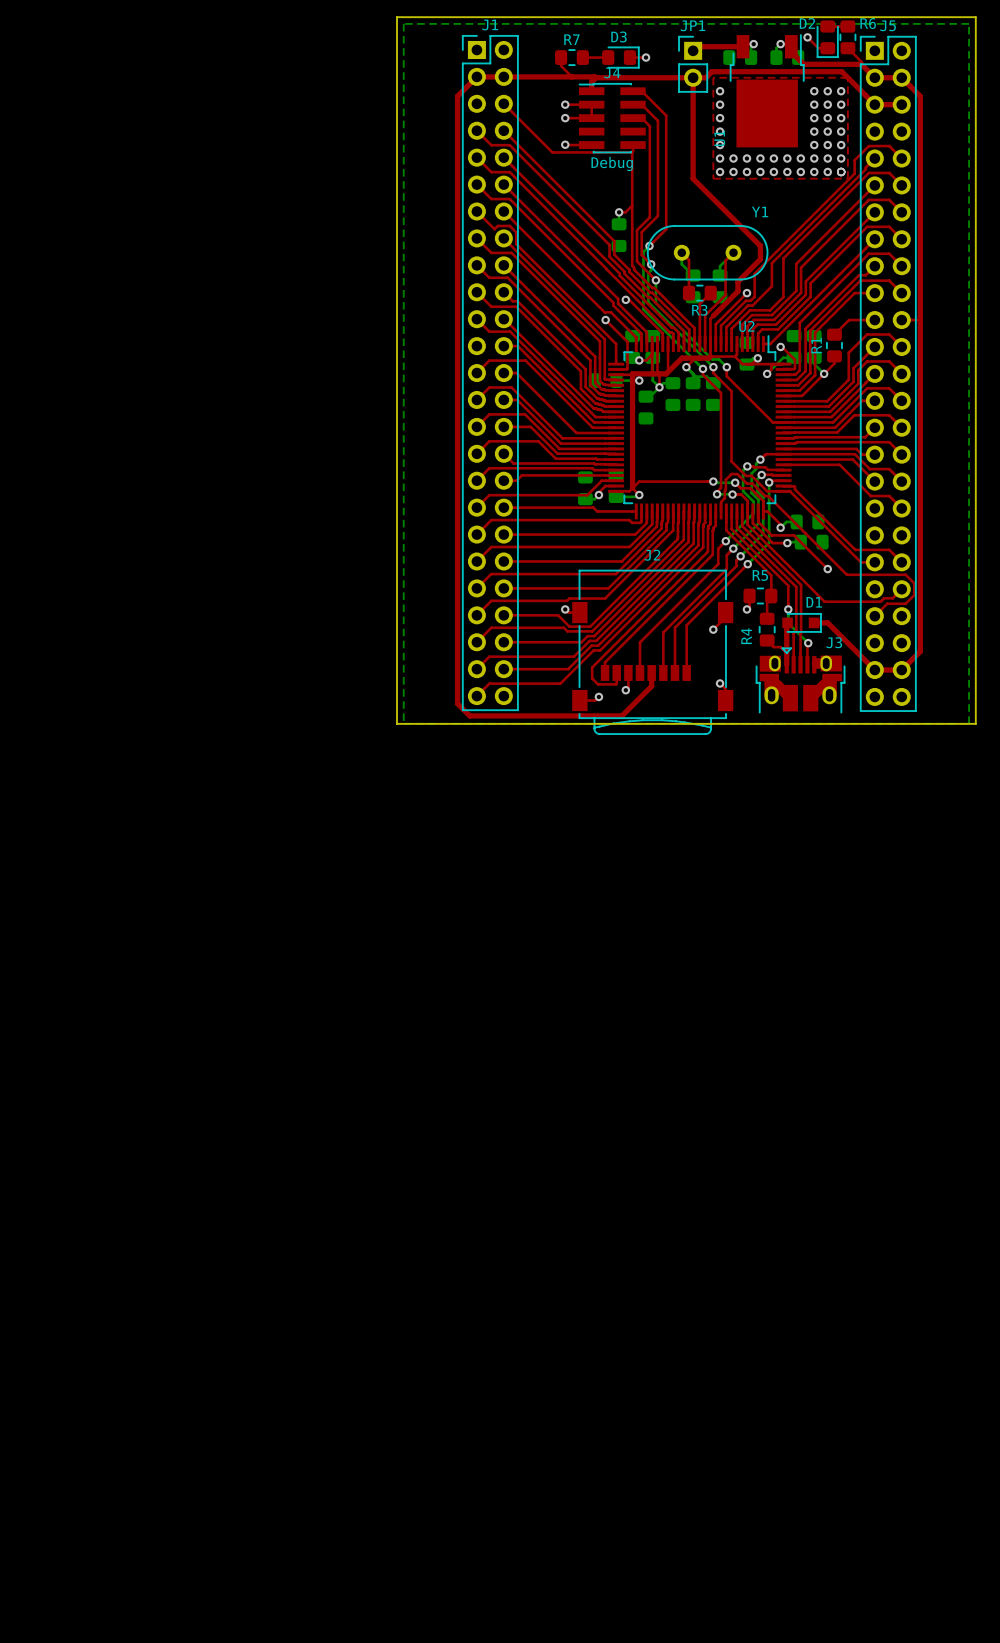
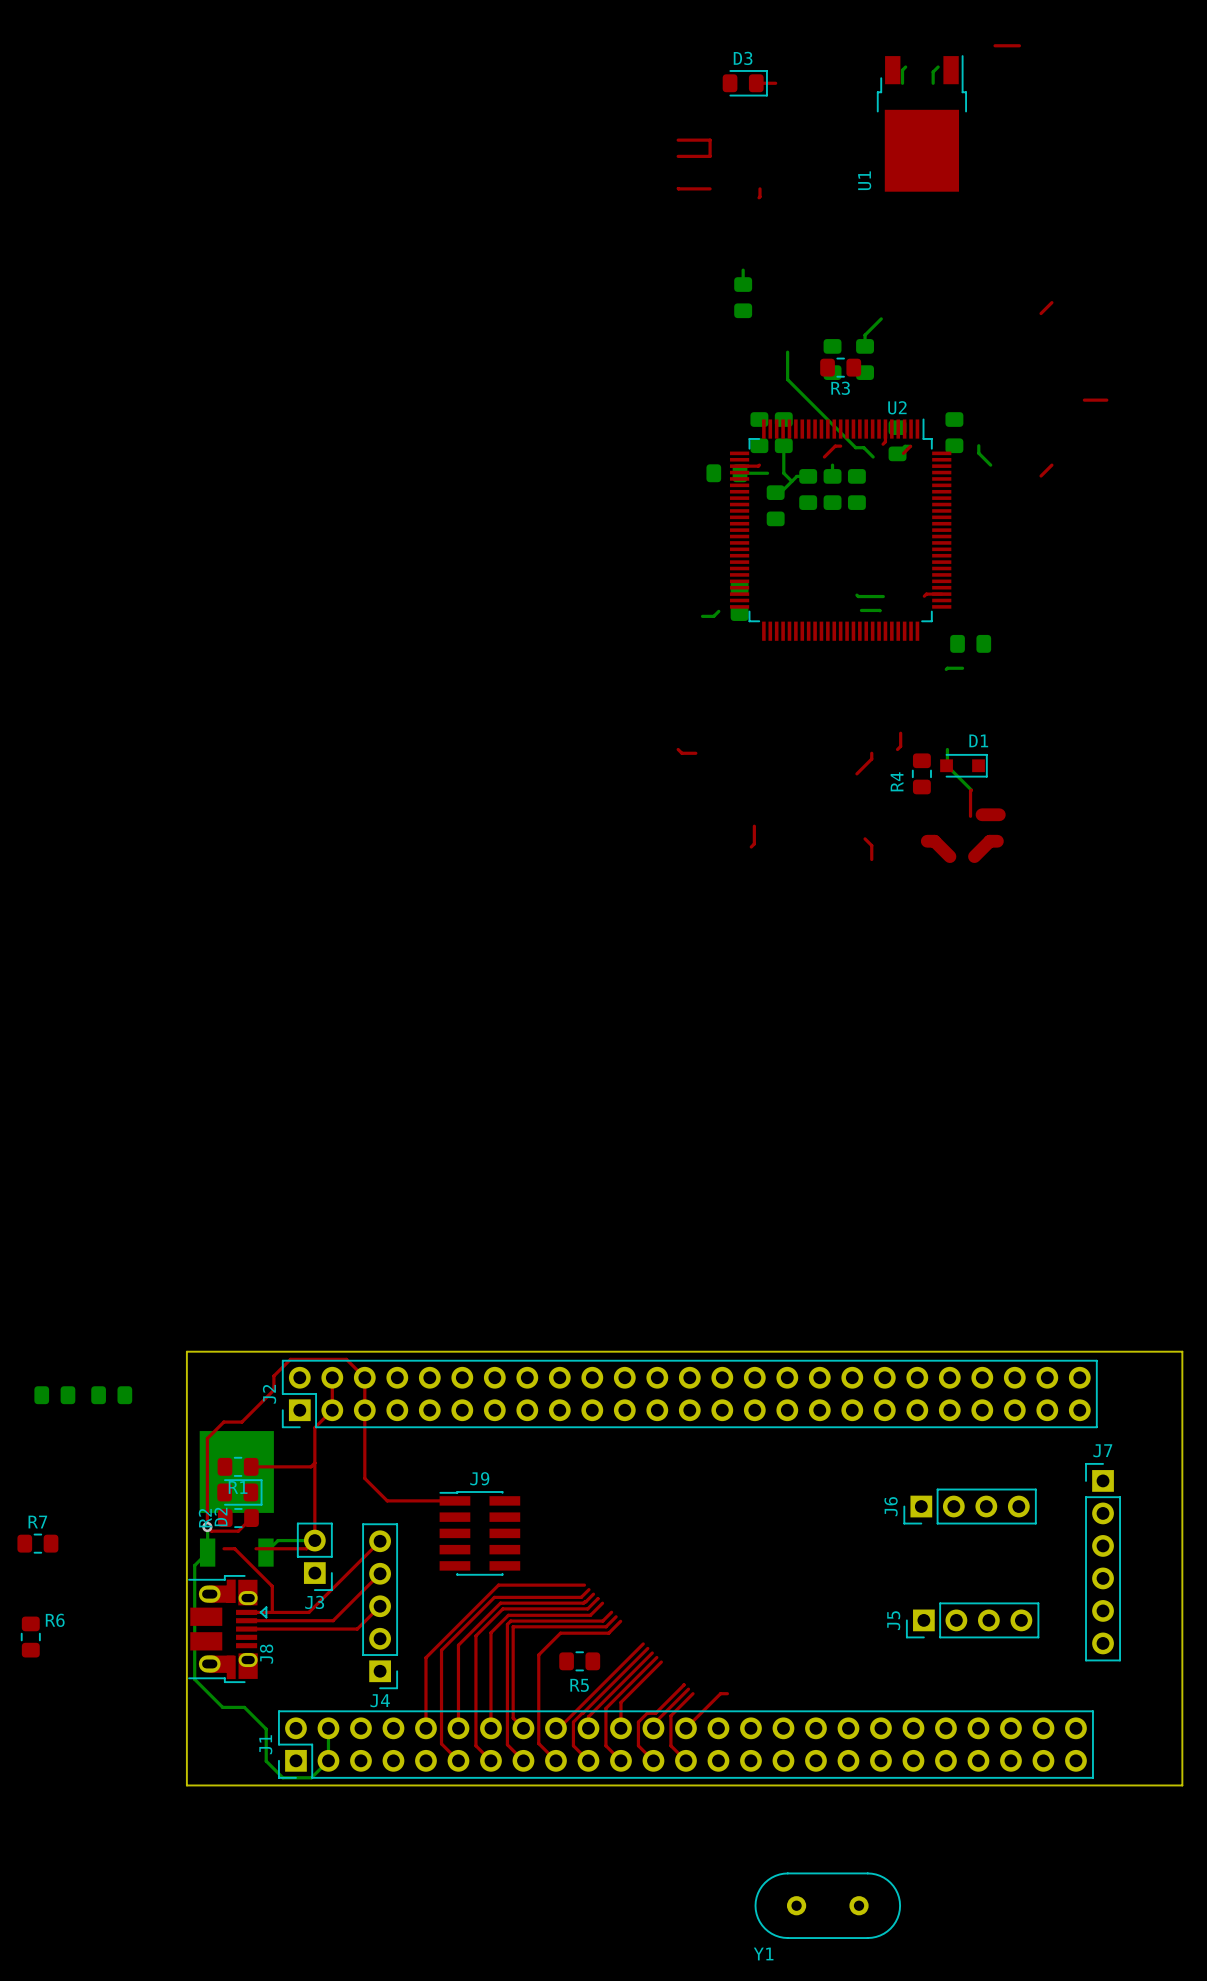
board edge: (397, 17) (397, 723) (975, 723) (975, 17) (397, 17) -> none
bottom zone outline: (403, 23) (403, 723) (969, 723) (969, 23) (403, 23) -> none
J5 name position: J5 (888, 25) -> J5 (893, 1620)
J5 footprint: [860, 36, 917, 712] -> [906, 1602, 1040, 1639]
top track: (807, 37) (818, 48) (827, 48) -> none
via: (807, 37) -> none
R6 position: (847, 37) -> (30, 1637)
D2 rotation: 0° (827, 39) -> 90° counterclockwise (239, 1492)
D2 position: (827, 39) -> (239, 1492)
top track: (753, 44) (745, 44) (743, 46) (697, 46) (693, 50) -> none
via: (753, 44) -> none
top track: (780, 44) (788, 44) (791, 46) (791, 52) (803, 64) (861, 64) -> none
via: (780, 44) -> none
top track: (847, 48) (861, 61) (861, 64) -> none
top track: (561, 57) (561, 66) (571, 76) -> none
R7 position: (571, 57) -> (37, 1543)
top track: (582, 57) (608, 57) -> none
via: (646, 57) -> none
part: (740, 57) -> none
part: (787, 57) -> none
JP1: (693, 64) -> none
top track: (861, 64) (874, 77) (901, 77) (920, 96) (920, 651) (901, 670) (874, 670) (827, 622) (814, 622) -> none
J4 name position: J4 (612, 72) -> J4 (380, 1700)
top track: (595, 77) (705, 77) (711, 71) (841, 71) (874, 104) (901, 104) -> none
top track: (595, 77) (591, 81) (591, 91) -> none
top track: (595, 77) (476, 76) (457, 96) (457, 703) (469, 715) (622, 715) (651, 686) (652, 674) -> none
top track: (693, 77) (693, 178) (760, 246) (760, 259) (737, 281) (737, 291) (710, 318) (710, 356) -> none
top zone outline: (713, 77) (713, 178) (847, 178) (847, 77) (713, 77) -> none
J4 footprint: [578, 83, 646, 154] -> [362, 1523, 398, 1690]
top track: (633, 91) (641, 91) (666, 115) (666, 229) (649, 246) -> none
via: (720, 91) -> none
via: (814, 91) -> none
via: (827, 91) -> none
via: (841, 91) -> none
top track: (503, 103) (552, 152) (632, 152) (632, 265) (694, 328) (694, 344) -> none
via: (565, 104) -> none
top track: (633, 104) (641, 104) (657, 120) (657, 215) (641, 232) (641, 254) (651, 264) -> none
via: (720, 104) -> none
via: (814, 104) -> none
via: (827, 104) -> none
via: (841, 104) -> none
via: (565, 118) -> none
top track: (633, 118) (641, 118) (649, 126) (649, 217) (637, 230) (637, 261) (655, 280) -> none
via: (720, 118) -> none
via: (814, 118) -> none
via: (827, 118) -> none
via: (841, 118) -> none
top track: (476, 130) (491, 145) (509, 145) (609, 244) (609, 256) (683, 331) (683, 344) -> none
top track: (503, 130) (614, 241) (614, 254) (689, 329) (689, 344) -> none
via: (720, 131) -> none
via: (814, 131) -> none
via: (827, 131) -> none
via: (841, 131) -> none
via: (565, 144) -> none
via: (720, 145) -> none
via: (814, 145) -> none
via: (827, 145) -> none
via: (841, 145) -> none
top track: (476, 157) (491, 172) (509, 172) (673, 333) (673, 344) -> none
top track: (503, 157) (678, 332) (678, 344) -> none
via: (720, 158) -> none
via: (733, 158) -> none
via: (746, 158) -> none
via: (760, 158) -> none
via: (773, 158) -> none
via: (787, 158) -> none
via: (800, 158) -> none
via: (814, 158) -> none
via: (827, 158) -> none
via: (841, 158) -> none
top track: (874, 158) (771, 263) (771, 286) (752, 305) (748, 305) (726, 327) (726, 344) -> none
top track: (901, 158) (889, 146) (868, 146) (854, 160) (854, 173) (754, 273) (754, 296) (750, 300) (746, 300) (721, 325) (721, 344) -> none
J4 value: Debug (612, 163) -> none
via: (720, 171) -> none
via: (733, 171) -> none
via: (746, 171) -> none
via: (760, 171) -> none
via: (773, 171) -> none
via: (787, 171) -> none
via: (800, 171) -> none
via: (814, 171) -> none
via: (827, 171) -> none
via: (841, 171) -> none
top track: (476, 184) (491, 199) (509, 199) (613, 302) (613, 305) (641, 333) (641, 344) -> none
top track: (503, 184) (618, 298) (618, 303) (646, 332) (646, 344) -> none
top track: (874, 185) (796, 263) (796, 290) (772, 315) (751, 315) (742, 324) (742, 344) -> none
top track: (901, 185) (889, 172) (868, 172) (783, 258) (783, 297) (770, 310) (749, 310) (731, 328) (731, 344) -> none
top track: (632, 205) (625, 212) (619, 212) -> none
top track: (476, 211) (494, 229) (497, 225) (509, 225) (516, 232) (516, 244) (616, 343) (616, 364) -> none
top track: (503, 211) (604, 312) (611, 312) (636, 337) (636, 344) -> none
Y1 name position: Y1 (760, 211) -> Y1 (763, 1954)
via: (619, 212) -> none
top track: (874, 212) (805, 281) (805, 294) (776, 324) (757, 324) (752, 329) (752, 344) -> none
top track: (901, 212) (889, 199) (868, 199) (801, 267) (801, 292) (774, 319) (753, 319) (747, 326) (747, 344) -> none
top track: (476, 238) (491, 252) (511, 252) (599, 341) (599, 380) (603, 384) (616, 385) -> none
top track: (503, 238) (604, 339) (604, 378) (616, 380) -> none
top track: (901, 239) (889, 226) (867, 226) (810, 283) (810, 296) (778, 329) (762, 329) (758, 333) (758, 344) -> none
bottom track: (649, 246) (643, 252) (643, 309) (701, 369) -> none
via: (649, 246) -> none
top track: (865, 248) (770, 344) (763, 344) -> none
top track: (681, 252) (689, 259) (689, 293) -> none
bottom track: (681, 252) (681, 264) (693, 275) -> none
Y1 position: (707, 252) -> (827, 1905)
top track: (733, 252) (725, 260) (725, 295) (705, 315) (705, 344) -> none
bottom track: (651, 264) (651, 270) (648, 273) (648, 302) (713, 367) -> none
via: (651, 264) -> none
top track: (476, 265) (489, 277) (507, 277) (590, 360) (590, 384) (599, 393) (616, 395) -> none
top track: (503, 265) (595, 356) (595, 382) (601, 389) (616, 390) -> none
top track: (874, 266) (865, 275) (859, 275) (805, 328) (805, 371) (796, 380) (783, 380) -> none
top track: (901, 266) (889, 253) (868, 253) (799, 322) (799, 370) (795, 374) (783, 374) -> none
via: (655, 280) -> none
top track: (476, 292) (491, 306) (516, 306) (580, 371) (580, 388) (595, 403) (604, 406) (616, 406) -> none
top track: (503, 292) (512, 301) (517, 301) (585, 369) (585, 386) (597, 398) (616, 401) -> none
top track: (710, 293) (699, 303) (699, 344) -> none
top track: (746, 293) (715, 324) (715, 344) -> none
via: (746, 293) -> none
top track: (874, 293) (854, 293) (815, 332) (815, 375) (799, 390) (783, 390) -> none
top track: (901, 293) (889, 280) (860, 280) (810, 330) (810, 373) (798, 385) (783, 385) -> none
top track: (625, 299) (629, 299) (662, 333) (662, 344) -> none
via: (625, 299) -> none
top track: (476, 319) (489, 331) (510, 331) (595, 417) (616, 417) -> none
top track: (503, 319) (593, 408) (603, 411) (616, 411) -> none
top track: (605, 320) (627, 341) (627, 368) (616, 369) -> none
via: (605, 320) -> none
top track: (874, 320) (849, 320) (834, 334) -> none
top track: (652, 344) (652, 373) -> none
top track: (657, 344) (659, 387) -> none
top track: (668, 344) (668, 372) (666, 373) -> none
R1 name position: R1 (816, 345) -> R1 (238, 1487)
R1 rotation: 0° (834, 345) -> 90° clockwise (238, 1466)
R1 position: (834, 345) -> (238, 1466)
top track: (503, 346) (517, 346) (594, 422) (616, 422) -> none
top track: (780, 346) (794, 359) (794, 369) (783, 369) -> none
via: (780, 346) -> none
part: (814, 346) -> none
top track: (874, 346) (853, 368) (853, 381) (828, 406) (783, 406) -> none
top track: (901, 346) (889, 334) (867, 334) (848, 352) (848, 379) (827, 401) (783, 401) -> none
top track: (652, 354) (646, 360) (639, 360) -> none
top track: (710, 356) (734, 356) (742, 364) (783, 364) -> none
top track: (710, 356) (681, 358) (666, 373) -> none
top track: (834, 356) (834, 363) (802, 395) (783, 395) -> none
bottom track: (794, 357) (783, 357) (767, 373) -> none
via: (757, 358) -> none
via: (639, 360) -> none
top track: (772, 364) (767, 373) -> none
bottom track: (686, 367) (695, 376) (706, 376) (713, 383) -> none
via: (686, 367) -> none
top track: (713, 367) (713, 373) (731, 391) (731, 461) (745, 475) (751, 475) (767, 491) (790, 491) (861, 562) (874, 562) -> none
via: (713, 367) -> none
top track: (726, 367) (726, 376) (772, 422) (833, 422) (867, 388) (889, 388) (901, 400) -> none
via: (726, 367) -> none
top track: (702, 368) (702, 374) (721, 392) (721, 487) (717, 494) -> none
via: (702, 368) -> none
top track: (476, 373) (489, 360) (525, 360) (592, 427) (616, 427) -> none
J1 rotation: 0° (490, 373) -> 90° counterclockwise (685, 1744)
J1 position: (490, 373) -> (685, 1744)
top track: (503, 373) (516, 373) (576, 433) (610, 433) -> none
top track: (666, 373) (632, 373) (632, 488) (639, 495) -> none
via: (767, 373) -> none
via: (824, 373) -> none
top track: (901, 373) (889, 361) (867, 361) (858, 370) (858, 383) (830, 411) (783, 411) -> none
via: (639, 380) -> none
top track: (865, 382) (831, 417) (783, 417) -> none
via: (659, 387) -> none
top track: (476, 399) (489, 387) (511, 387) (562, 438) (616, 438) -> none
top track: (503, 399) (517, 399) (561, 443) (616, 443) -> none
top track: (874, 400) (862, 400) (835, 427) (780, 427) -> none
top track: (476, 426) (489, 414) (525, 414) (559, 448) (616, 448) -> none
top track: (503, 426) (530, 426) (557, 453) (616, 454) -> none
top track: (874, 427) (865, 437) (783, 438) -> none
top track: (901, 427) (889, 415) (854, 415) (837, 432) (783, 433) -> none
top track: (783, 443) (889, 442) (901, 454) -> none
top track: (783, 448) (856, 448) (862, 454) (874, 454) -> none
top track: (476, 453) (489, 441) (538, 441) (555, 458) (616, 459) -> none
top track: (503, 453) (513, 463) (616, 464) -> none
top track: (760, 459) (765, 454) (854, 454) (869, 469) (889, 469) (901, 481) -> none
bottom track: (760, 459) (751, 473) (751, 493) (758, 499) (758, 523) (733, 548) -> none
via: (760, 459) -> none
top track: (783, 459) (852, 459) (874, 481) -> none
top track: (783, 464) (839, 464) (870, 496) (889, 496) (901, 508) -> none
top track: (747, 466) (783, 470) -> none
bottom track: (747, 466) (743, 470) (743, 491) (753, 501) (753, 513) (725, 541) -> none
via: (747, 466) -> none
top track: (616, 470) (594, 470) (592, 468) (489, 468) (476, 480) -> none
top track: (761, 474) (783, 475) -> none
bottom track: (761, 474) (757, 479) (757, 492) (763, 497) (763, 533) (740, 556) -> none
via: (761, 474) -> none
top track: (616, 475) (521, 475) (516, 480) (503, 480) -> none
top track: (616, 480) (601, 480) (587, 495) (489, 495) (476, 507) -> none
top track: (713, 481) (639, 481) (629, 491) (616, 491) -> none
via: (713, 481) -> none
top track: (735, 482) (740, 488) (750, 488) (763, 501) (763, 511) (767, 511) (780, 524) (780, 527) -> none
via: (735, 482) -> none
bottom track: (769, 482) (769, 542) (747, 564) -> none
via: (769, 482) -> none
top track: (616, 486) (605, 486) (598, 495) -> none
top track: (783, 486) (794, 486) (794, 489) (855, 549) (889, 549) (901, 562) -> none
part: (585, 488) -> none
via: (717, 494) -> none
top track: (732, 494) (741, 494) (747, 500) (747, 524) (824, 601) (880, 601) (884, 598) (892, 598) (901, 589) -> none
via: (732, 494) -> none
via: (598, 495) -> none
bottom track: (639, 495) (637, 496) (616, 496) -> none
via: (639, 495) -> none
top track: (503, 507) (593, 507) (597, 511) (636, 511) -> none
top track: (641, 511) (640, 522) (632, 522) (629, 520) (491, 520) (476, 534) -> none
top track: (646, 511) (646, 523) (635, 534) (503, 534) -> none
top track: (652, 511) (652, 524) (629, 547) (491, 547) (476, 561) -> none
top track: (657, 511) (656, 526) (621, 561) (503, 561) -> none
top track: (662, 511) (661, 528) (616, 574) (491, 574) (476, 588) -> none
top track: (668, 511) (666, 530) (608, 588) (503, 588) -> none
top track: (673, 511) (673, 530) (605, 598) (569, 598) (567, 600) (491, 600) (476, 615) -> none
top track: (678, 511) (677, 538) -> none
top track: (683, 511) (683, 539) (592, 631) (567, 631) (563, 627) (491, 627) (476, 642) -> none
top track: (689, 511) (688, 541) (594, 636) (587, 636) (581, 642) (503, 642) -> none
top track: (694, 511) (693, 543) (596, 640) (589, 640) (573, 656) (489, 656) (476, 669) -> none
top track: (699, 511) (698, 545) (598, 645) (591, 645) (568, 669) (503, 669) -> none
top track: (705, 511) (703, 547) (600, 650) (593, 650) (560, 683) (489, 683) (476, 696) -> none
top track: (710, 511) (707, 551) (592, 667) (592, 678) (598, 684) (615, 684) (616, 672) -> none
top track: (715, 511) (715, 525) (712, 530) (712, 554) (605, 662) (605, 672) -> none
top track: (721, 511) (721, 502) (724, 498) (725, 479) (731, 474) (737, 474) (746, 483) (752, 483) (765, 496) (768, 496) (846, 574) (905, 574) (914, 583) (914, 595) (905, 603) (887, 603) (874, 616) -> none
top track: (726, 511) (726, 530) (771, 575) (771, 595) (767, 600) (767, 618) -> none
top track: (731, 511) (731, 529) (788, 585) (788, 609) -> none
top track: (736, 511) (736, 527) (796, 586) (793, 664) -> none
top track: (742, 511) (742, 526) (801, 584) (800, 664) -> none
top track: (752, 511) (752, 523) (772, 543) (787, 543) -> none
top track: (758, 511) (758, 522) (771, 535) (794, 535) (827, 569) -> none
bottom track: (796, 521) (786, 521) (780, 527) -> none
via: (780, 527) -> none
top track: (677, 538) (590, 626) (569, 626) (558, 615) (503, 615) -> none
top track: (725, 541) (718, 548) (718, 564) (640, 642) (640, 672) -> none
via: (725, 541) -> none
part: (811, 542) -> none
via: (787, 543) -> none
top track: (733, 548) (726, 555) (726, 569) (663, 632) (663, 672) -> none
via: (733, 548) -> none
J2 name position: J2 (652, 555) -> J2 (269, 1394)
top track: (740, 556) (736, 560) (736, 566) (675, 627) (675, 672) -> none
via: (740, 556) -> none
top track: (747, 564) (686, 625) (686, 672) -> none
via: (747, 564) -> none
J2 footprint: [572, 569, 734, 735] -> [282, 1359, 1098, 1429]
via: (827, 569) -> none
R5 name position: R5 (760, 575) -> R5 (579, 1685)
R5 position: (760, 595) -> (579, 1661)
via: (565, 609) -> none
via: (746, 609) -> none
via: (788, 609) -> none
top track: (787, 622) (786, 664) (786, 653) (780, 647) (773, 647) (767, 640) -> none
via: (713, 629) -> none
J3 name position: J3 (834, 642) -> J3 (314, 1602)
via: (808, 643) -> none
J3 footprint: [755, 647, 846, 714] -> [297, 1522, 333, 1591]
via: (720, 683) -> none
via: (625, 690) -> none
top track: (598, 696) (595, 700) (579, 700) -> none
via: (598, 696) -> none
board edge: none -> (186, 1351) (186, 1785) (1182, 1785) (1182, 1351) (186, 1351)
top track: none -> (332, 1377) (332, 1410) (314, 1427) (314, 1540) (306, 1548) (255, 1548)
part: none -> (54, 1395)
part: none -> (111, 1395)
top track: none -> (314, 1463) (311, 1466) (251, 1466)
part: none -> (236, 1498)
top track: none -> (454, 1500) (387, 1500) (364, 1478) (364, 1377) (346, 1359) (290, 1359) (273, 1376) (273, 1390) (241, 1422) (223, 1422) (207, 1438) (207, 1526) (211, 1531) (238, 1531) (251, 1518)
J6: none -> (970, 1506)
R2: none -> (238, 1518)
bottom track: none -> (207, 1526) (207, 1552) (194, 1565) (194, 1679) (222, 1707) (244, 1707) (266, 1729) (266, 1761) (282, 1777) (311, 1777) (328, 1760) (328, 1728)
via: none -> (207, 1526)
J9: none -> (479, 1533)
bottom track: none -> (314, 1540) (277, 1540) (265, 1552)
top track: none -> (380, 1541) (308, 1612) (246, 1612)
top track: none -> (224, 1548) (234, 1548) (272, 1586) (272, 1612)
J7: none -> (1103, 1562)
top track: none -> (380, 1573) (333, 1620) (246, 1620)
top track: none -> (584, 1585) (498, 1585) (425, 1657) (425, 1728)
top track: none -> (588, 1589) (581, 1597) (494, 1597) (441, 1650) (441, 1743) (458, 1760)
top track: none -> (593, 1594) (583, 1603) (500, 1603) (458, 1645) (458, 1728)
top track: none -> (597, 1598) (587, 1608) (502, 1608) (475, 1635) (475, 1745) (490, 1760)
top track: none -> (602, 1603) (590, 1615) (508, 1615) (490, 1632) (490, 1728)
top track: none -> (380, 1606) (357, 1629) (246, 1629)
top track: none -> (611, 1612) (602, 1621) (510, 1621) (507, 1624) (507, 1744) (523, 1760)
top track: none -> (616, 1616) (606, 1626) (513, 1626) (513, 1718) (523, 1728)
top track: none -> (620, 1621) (608, 1633) (560, 1633) (538, 1654) (538, 1743) (555, 1760)
J8: none -> (227, 1629)
top track: none -> (643, 1643) (558, 1728) (555, 1728)
top track: none -> (647, 1648) (573, 1722) (573, 1745) (588, 1760)
top track: none -> (652, 1652) (588, 1716) (588, 1728)
top track: none -> (656, 1657) (605, 1708) (605, 1745) (620, 1760)
top track: none -> (661, 1662) (620, 1702) (620, 1728)
top track: none -> (683, 1684) (655, 1713) (647, 1713) (638, 1722) (638, 1745) (653, 1760)
top track: none -> (688, 1689) (653, 1724) (653, 1728)
top track: none -> (693, 1693) (670, 1715) (670, 1745) (685, 1760)
top track: none -> (727, 1693) (720, 1693) (685, 1728)

